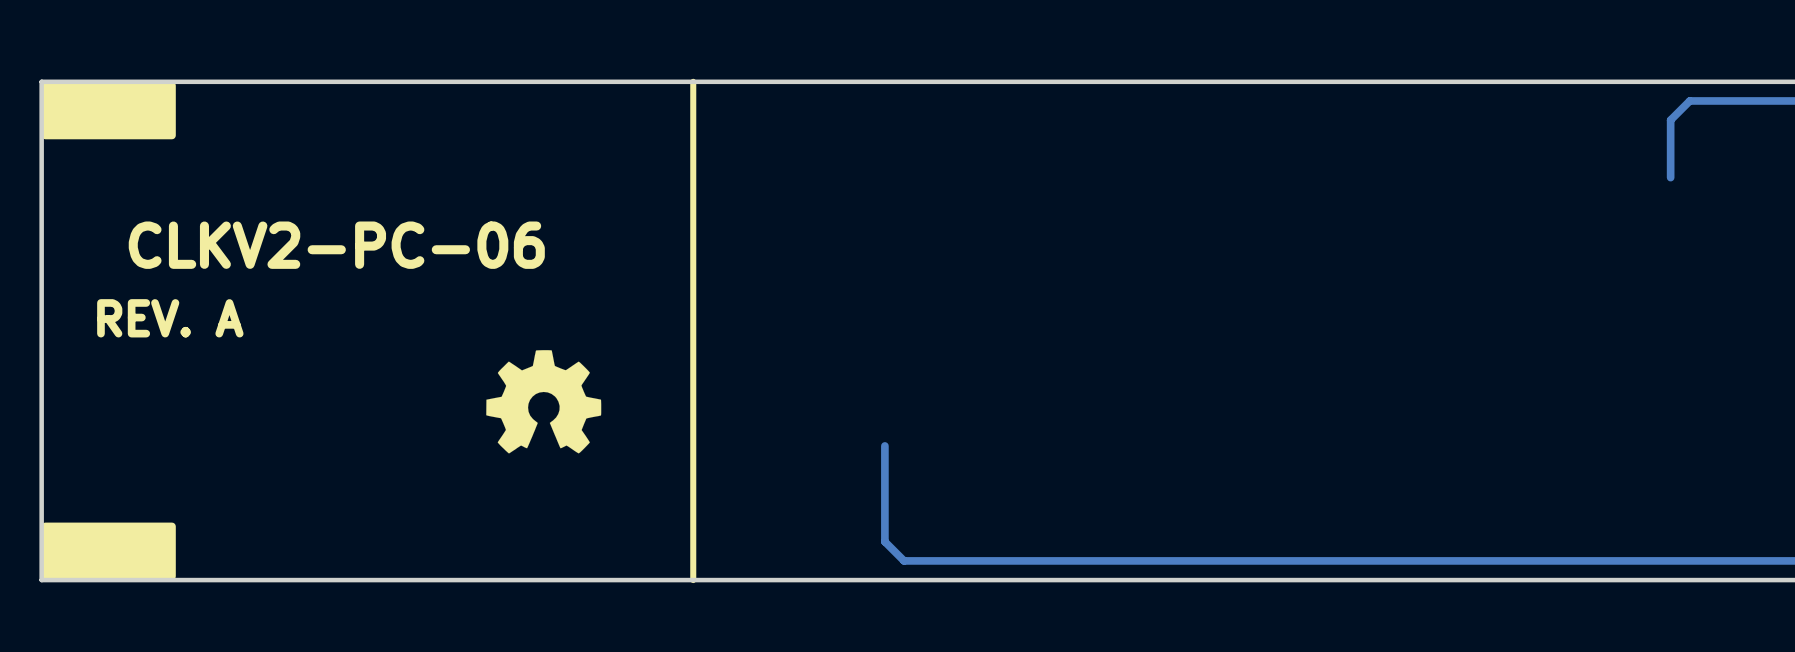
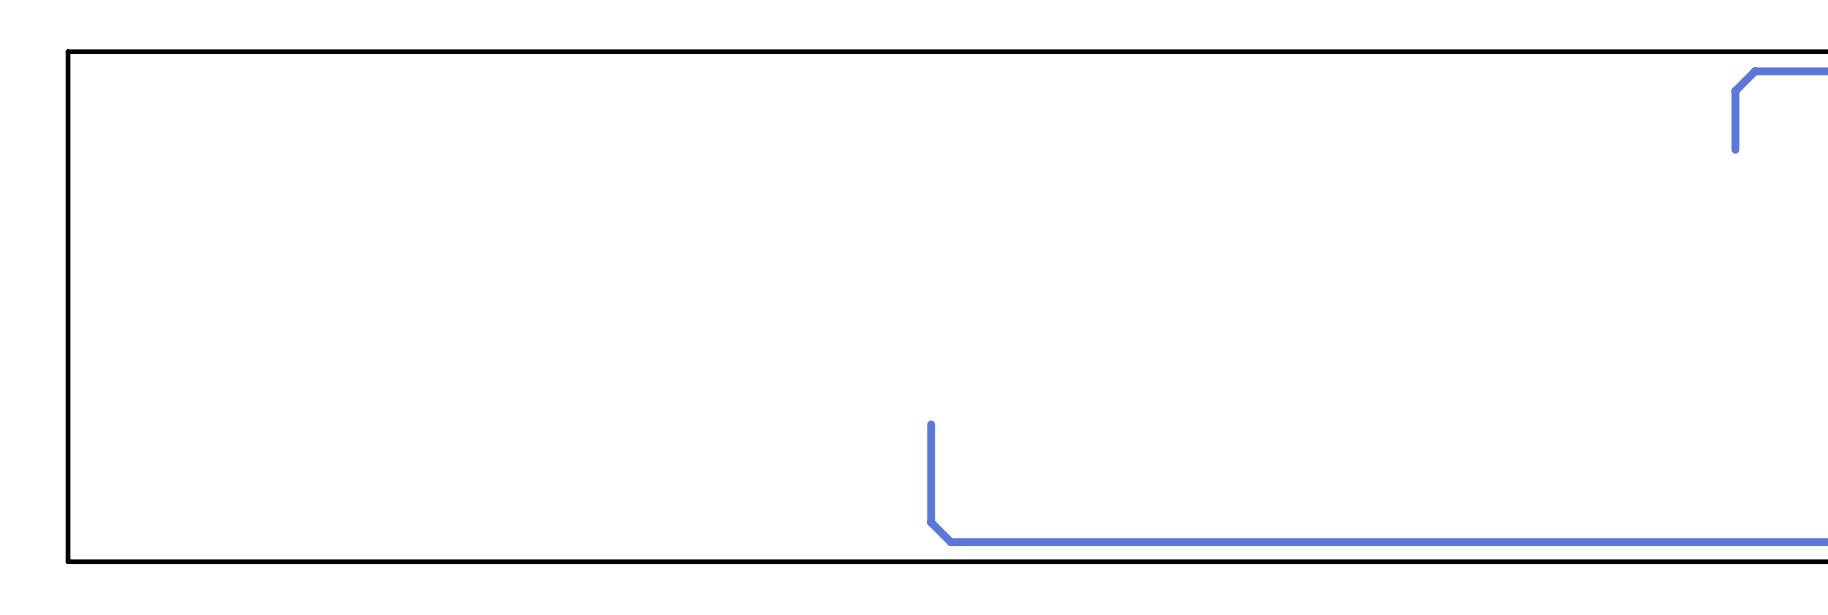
drawing: [41, 81, 176, 140] -> none
line: (693, 81) (693, 580) -> none
text: CLKV2-PC-06 (336, 245) -> none
text: REV. A (170, 318) -> none
drawing: [486, 350, 602, 454] -> none
drawing: [41, 522, 176, 581] -> none

